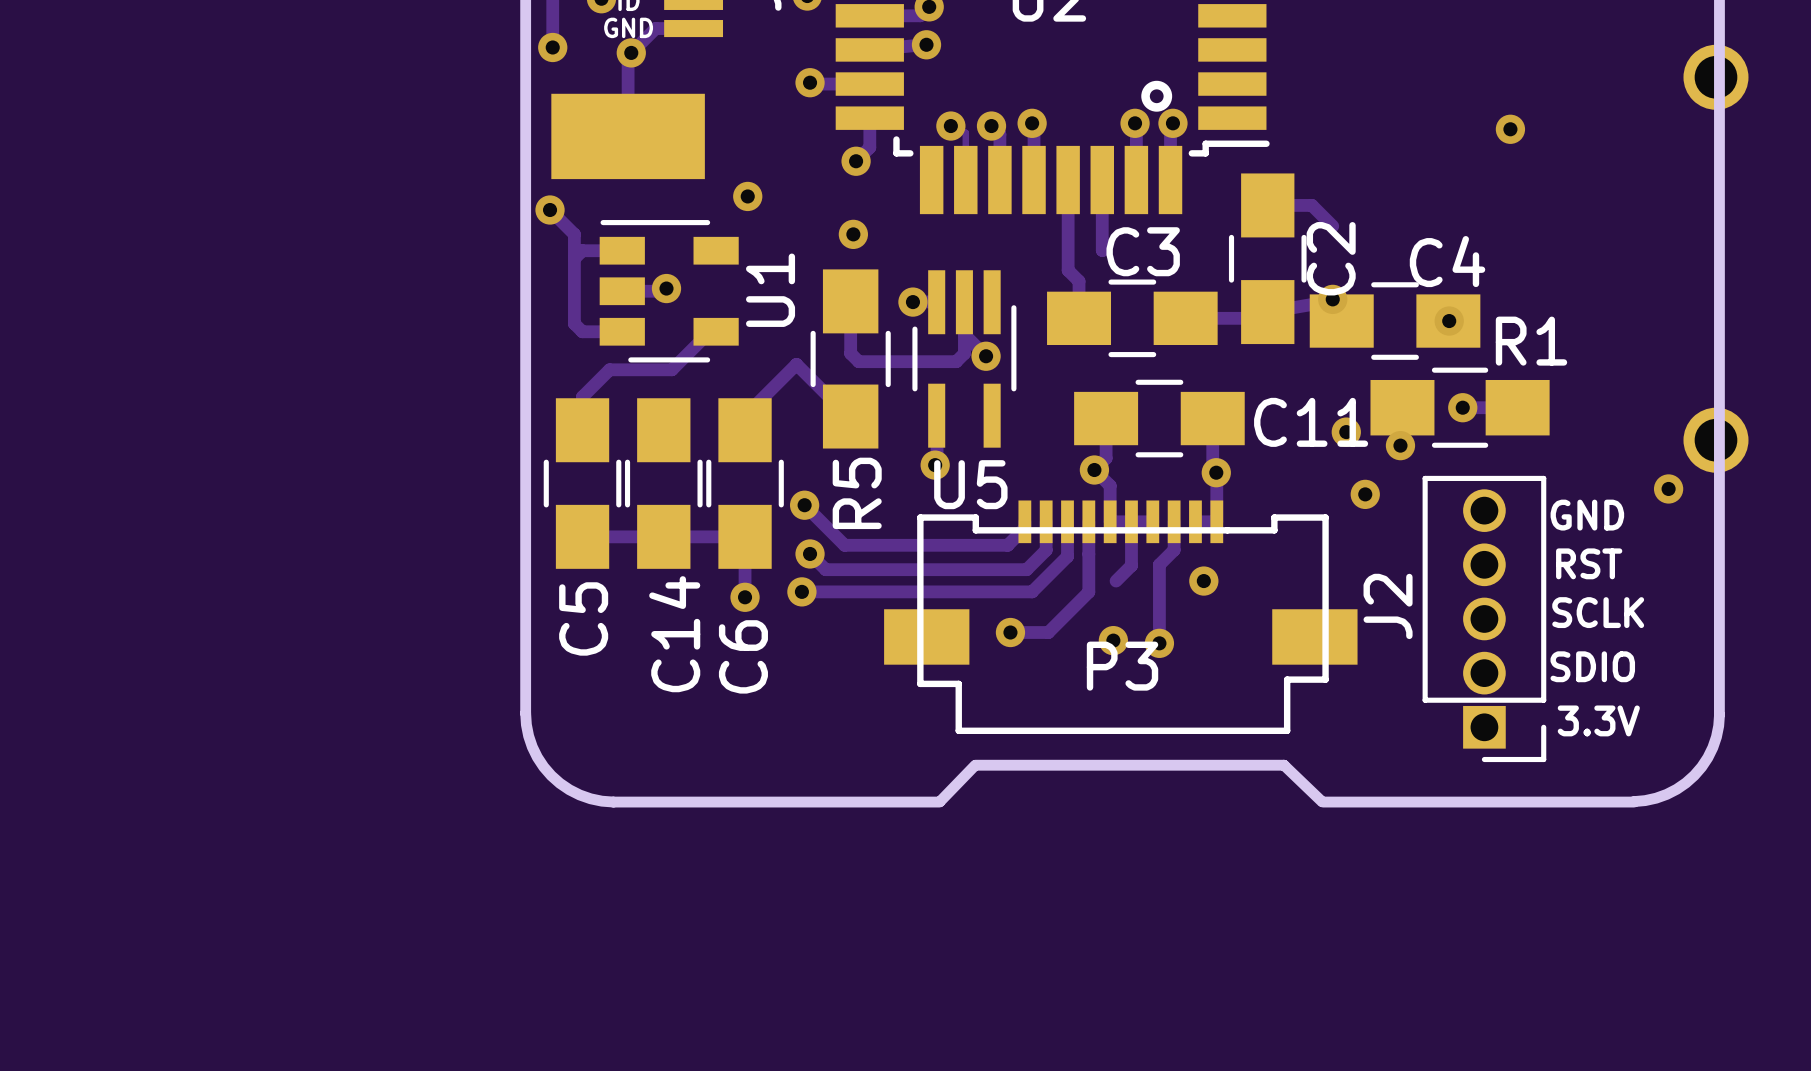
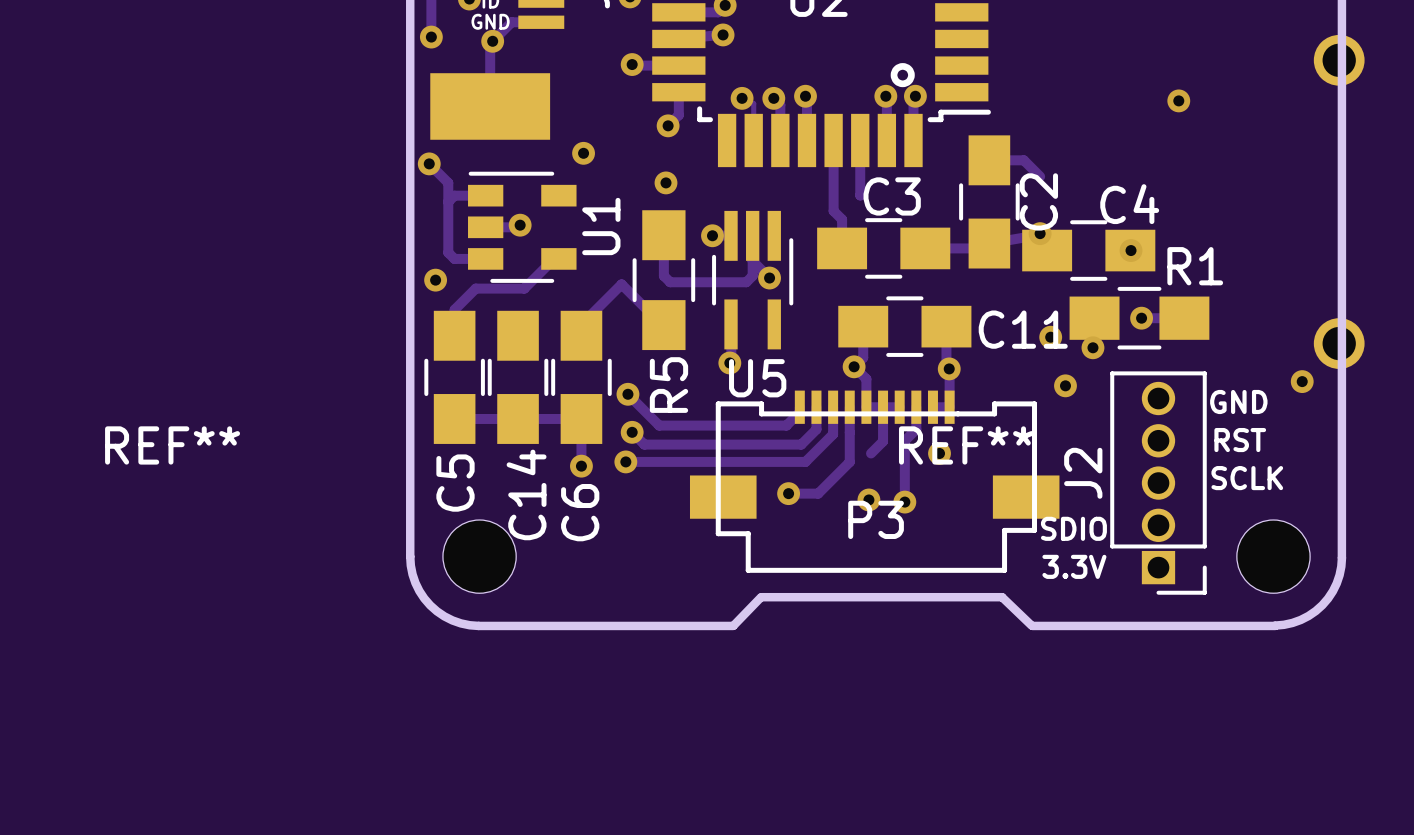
via: none -> (435, 280)
text position: SDIO (1592, 666) -> SDIO (1073, 528)
REF**: none -> (479, 556)
REF**: none -> (1273, 556)
text position: 3.3V (1598, 720) -> 3.3V (1074, 566)

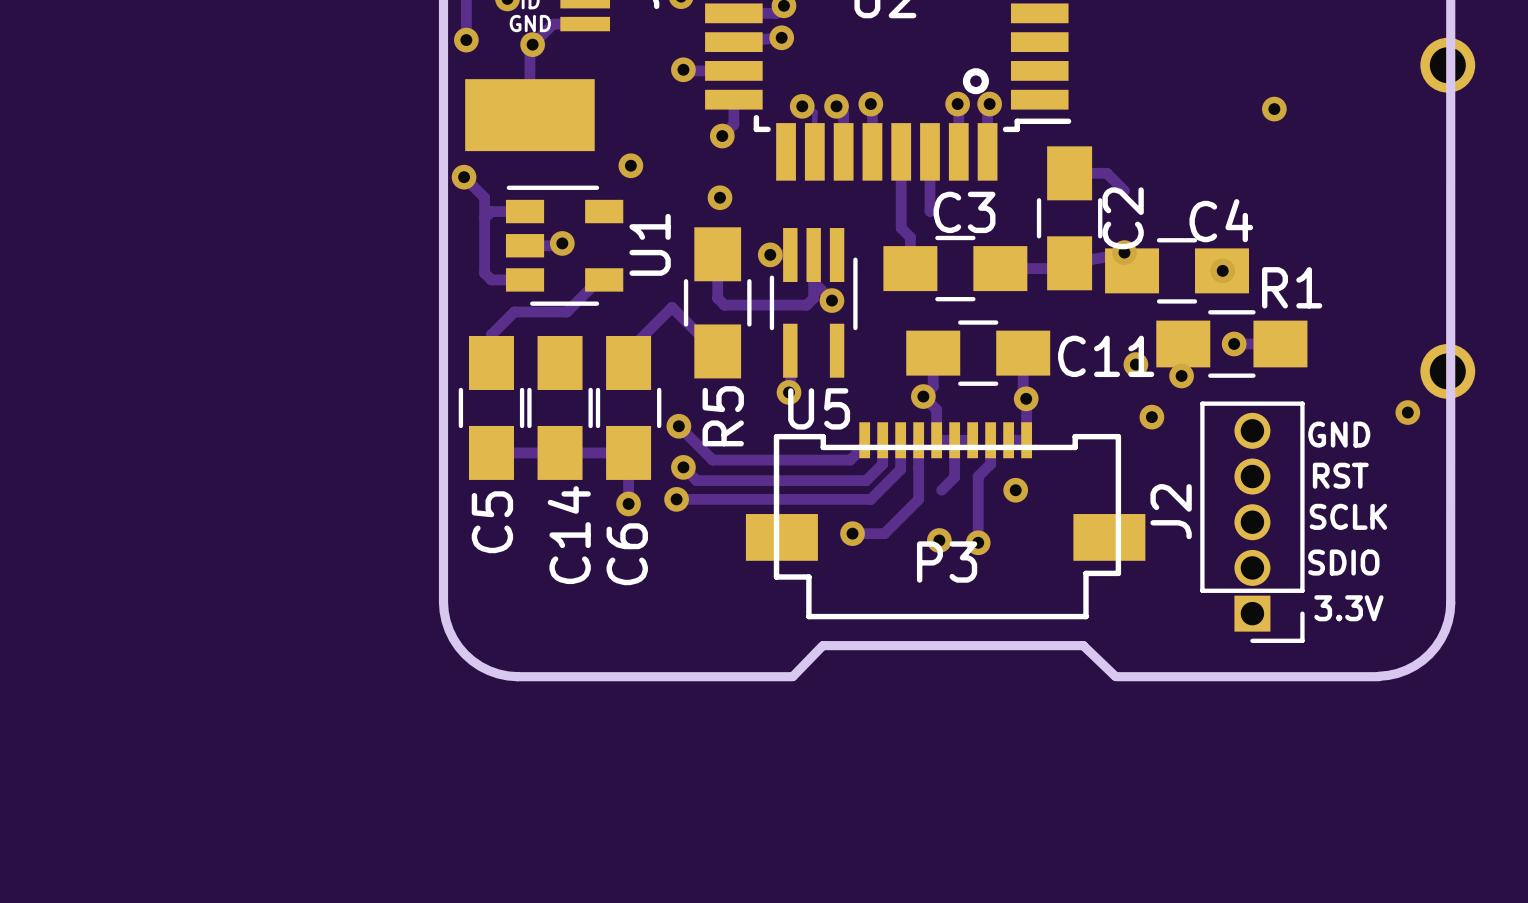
via: (435, 280) -> none
text position: SDIO (1073, 528) -> SDIO (1343, 562)
REF**: (479, 556) -> none
REF**: (1273, 556) -> none
text position: 3.3V (1074, 566) -> 3.3V (1348, 608)

